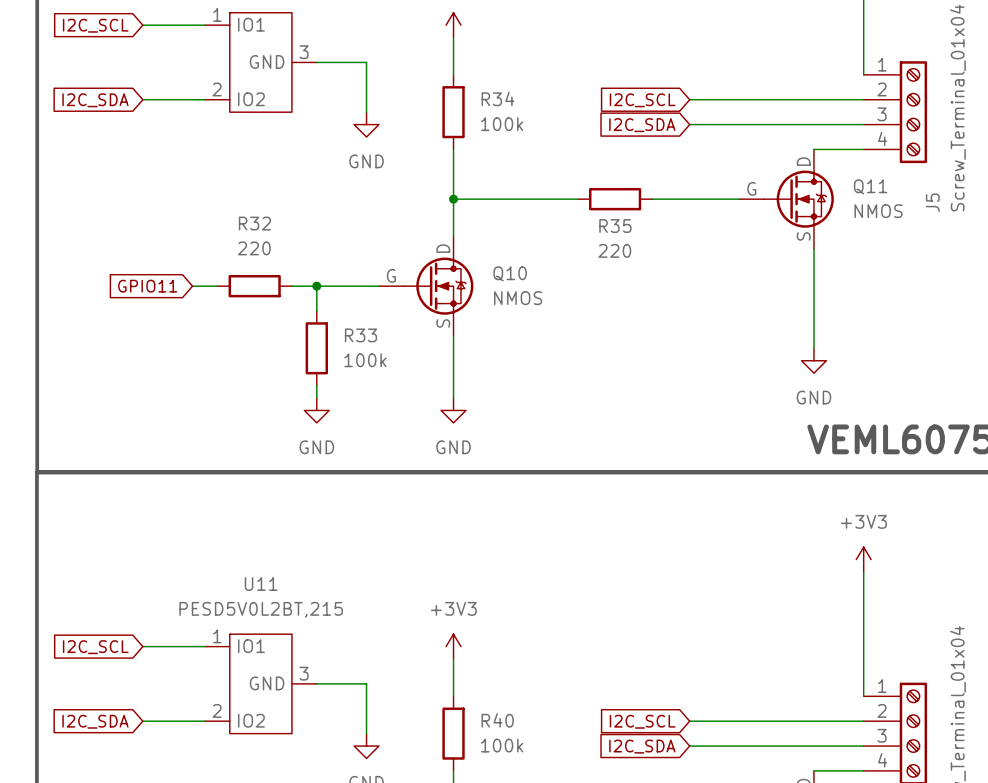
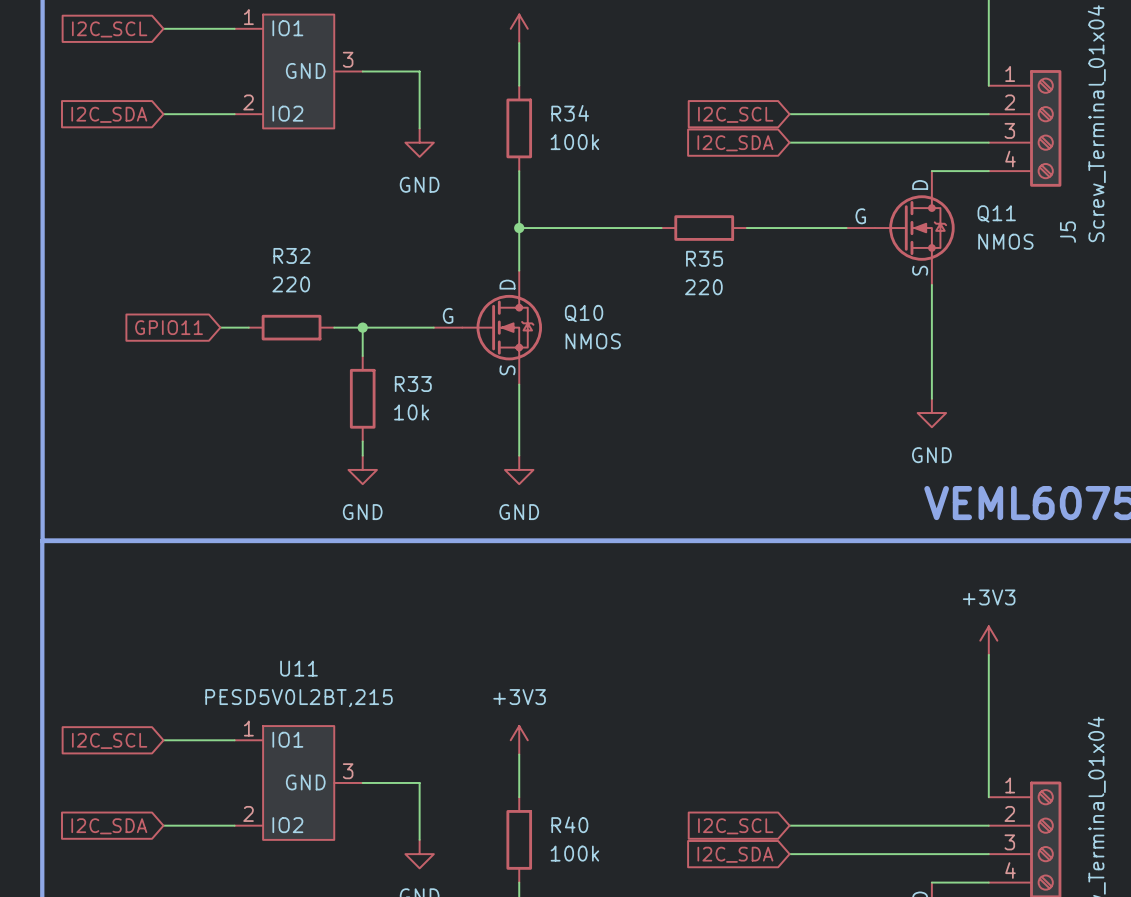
R33 value: 100k (365, 360) -> 10k (411, 412)

